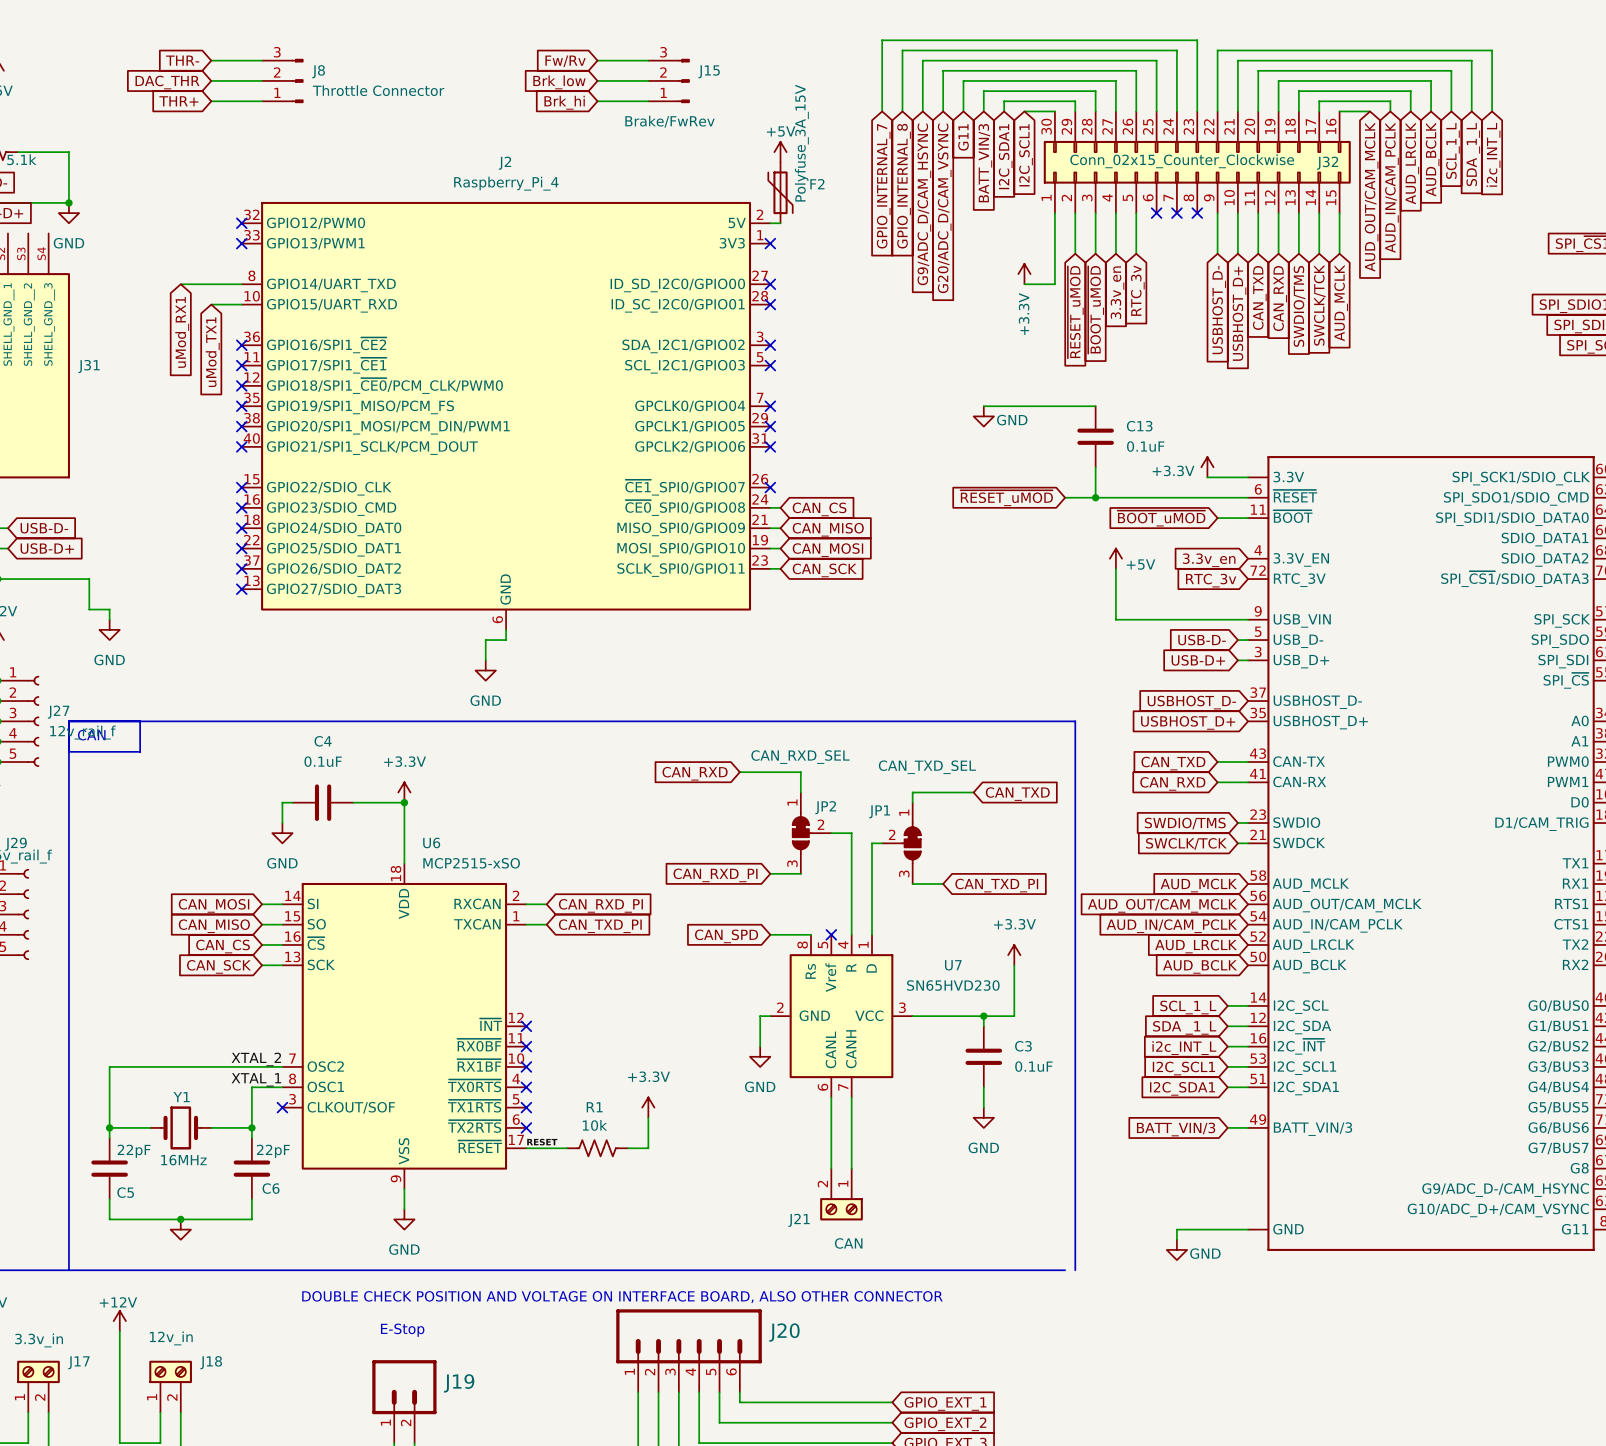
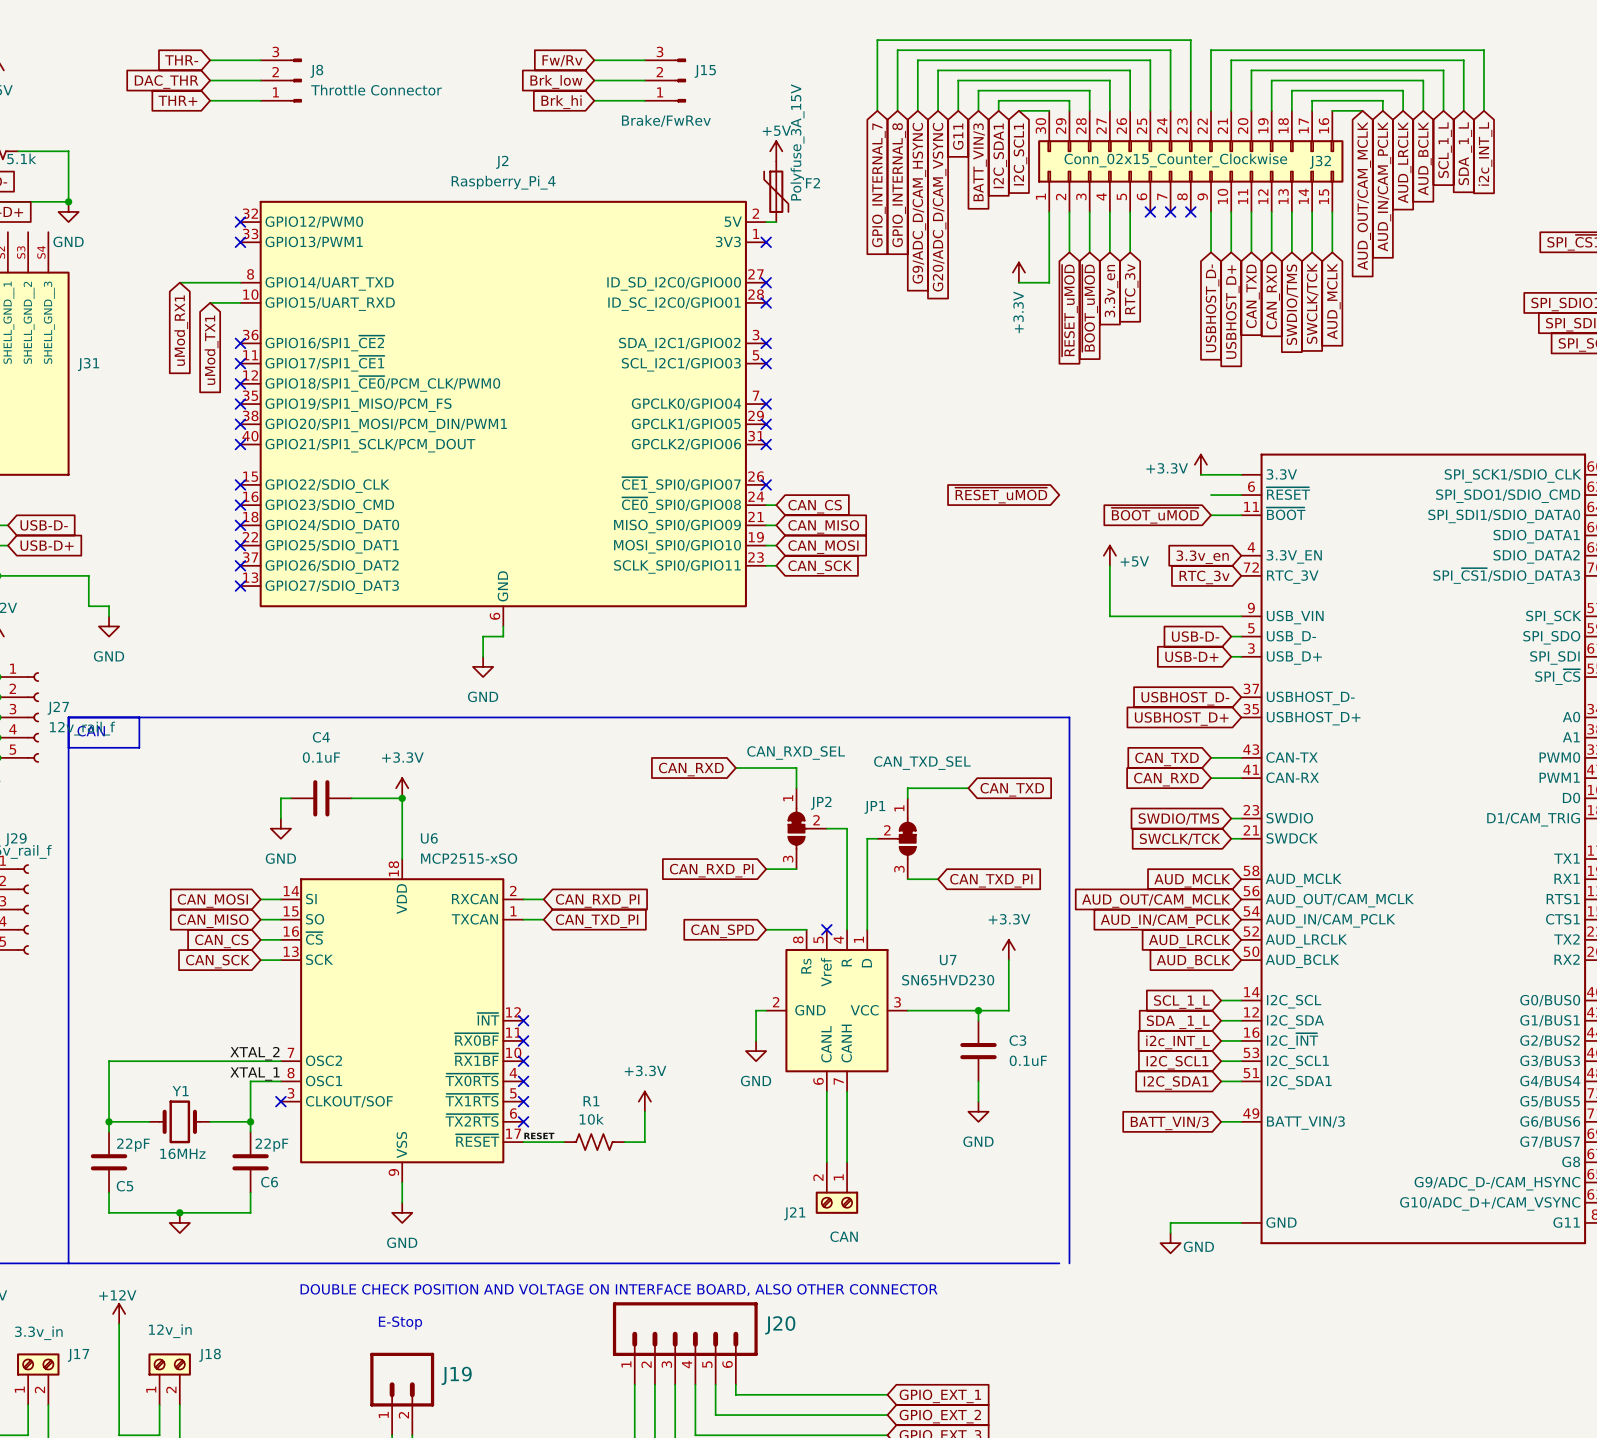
wire: (983, 406) (1095, 406) -> none
power symbol: GND (983, 416) -> none
C13: 0.1uF (1095, 436) -> none
wire: (1095, 467) (1095, 497) -> none
wire: (1065, 497) (1217, 497) -> none
junction: (1095, 497) -> none

